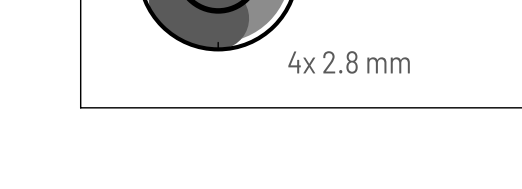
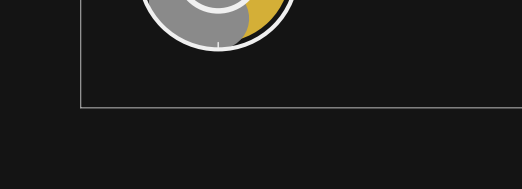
text: 4x 2.8 mm (349, 62) -> none

